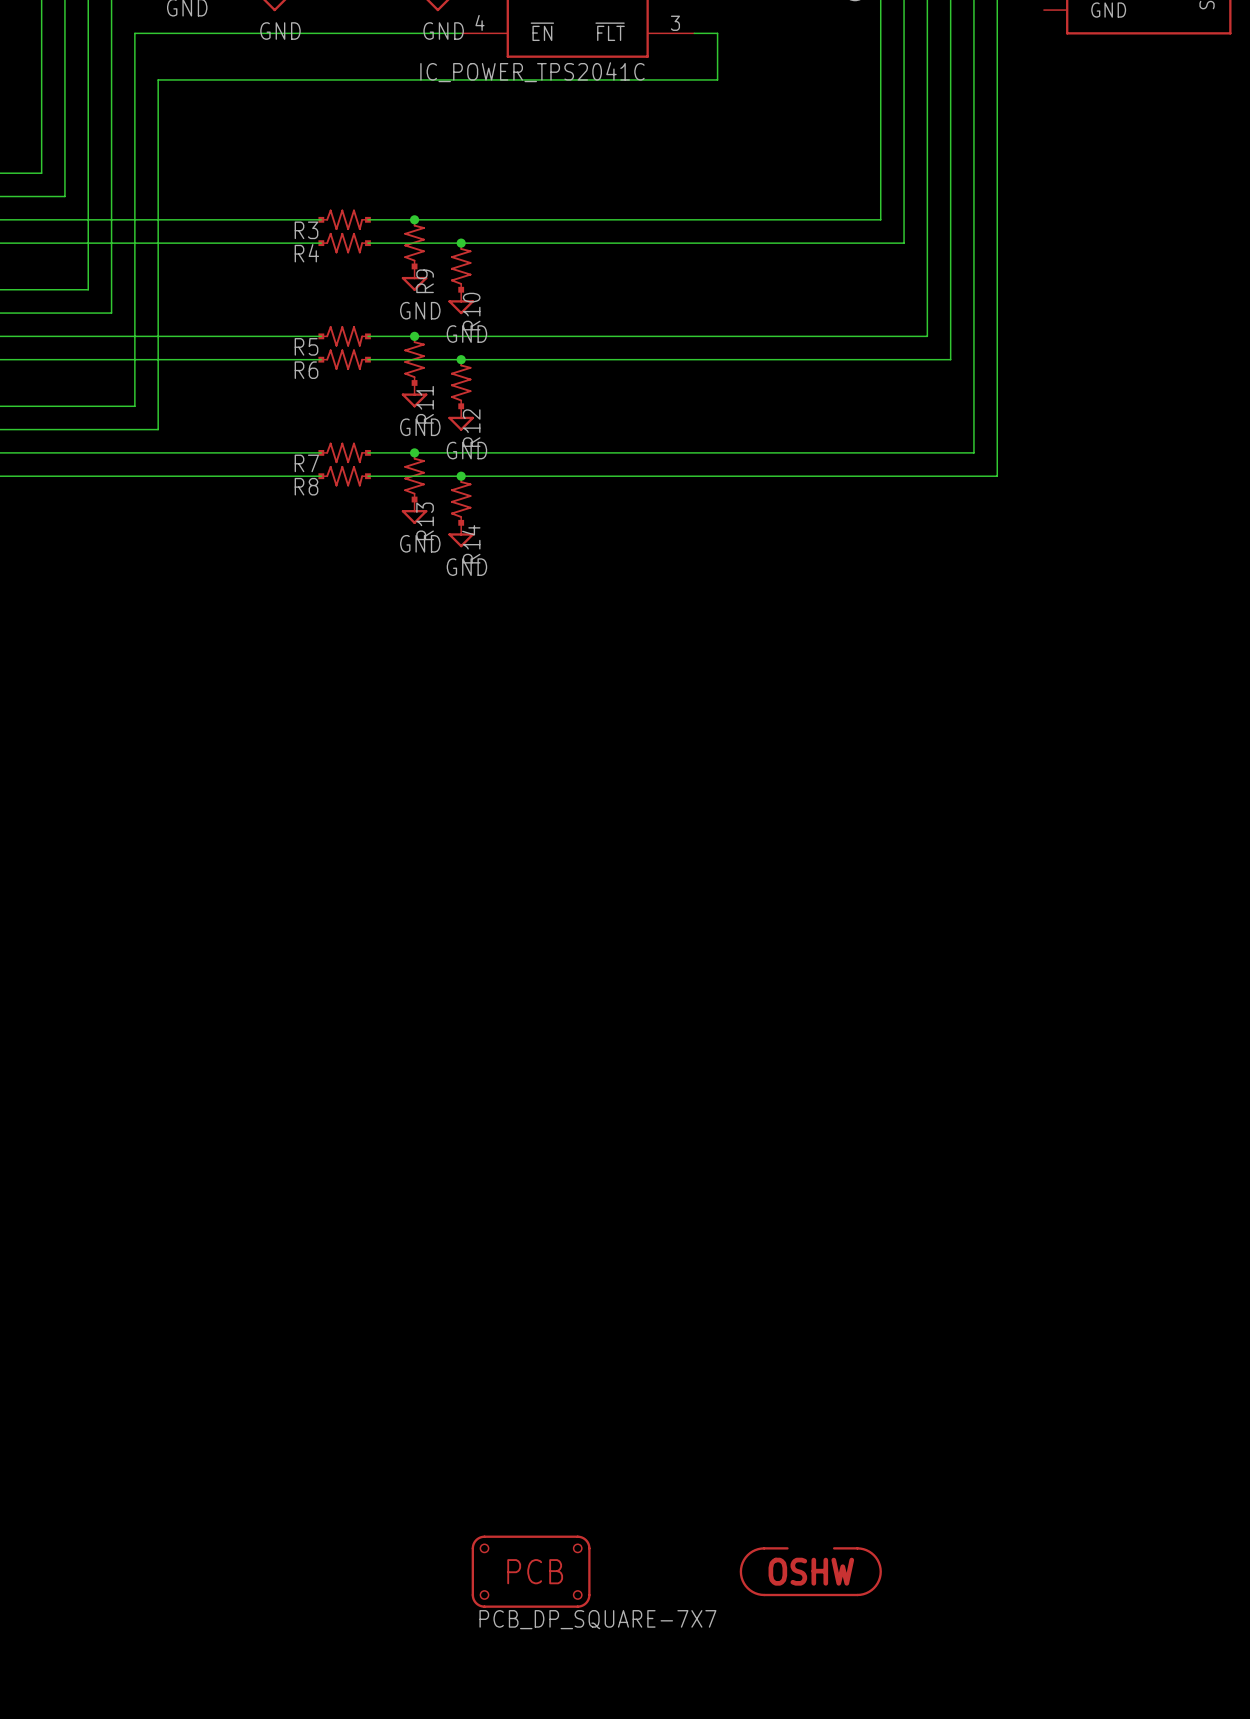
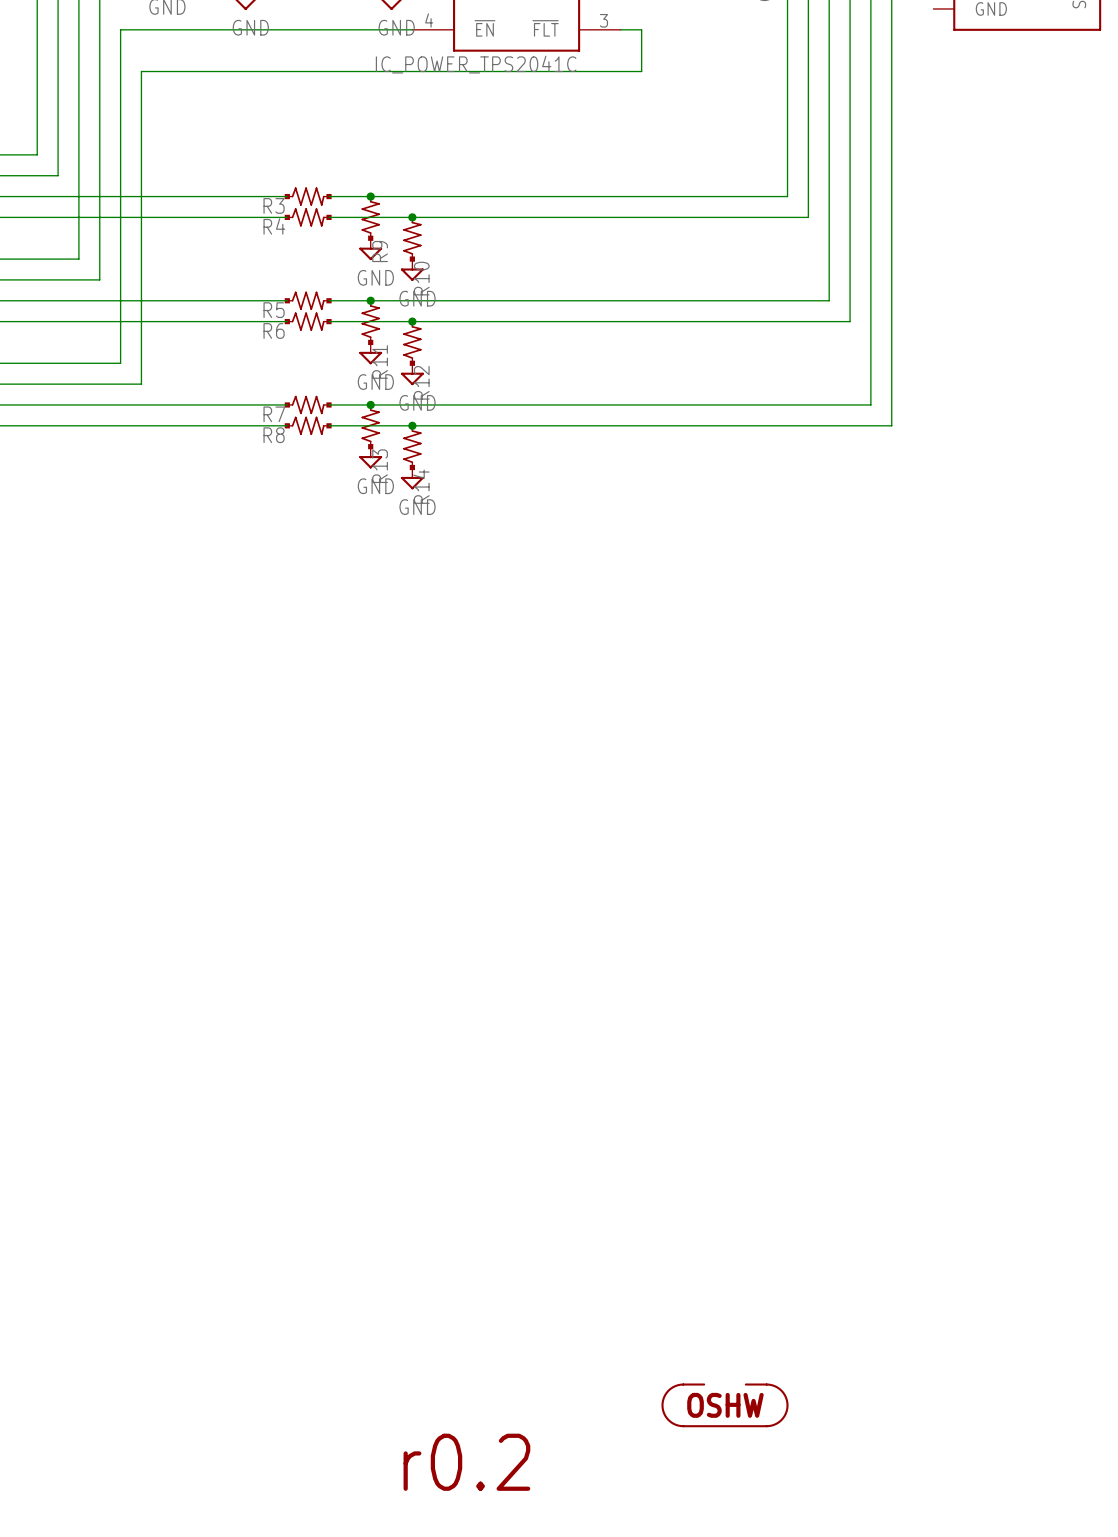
part: PCB_DP_SQUARE-7X7 (531, 1571) -> none
text: none -> r0.2 (466, 1462)

